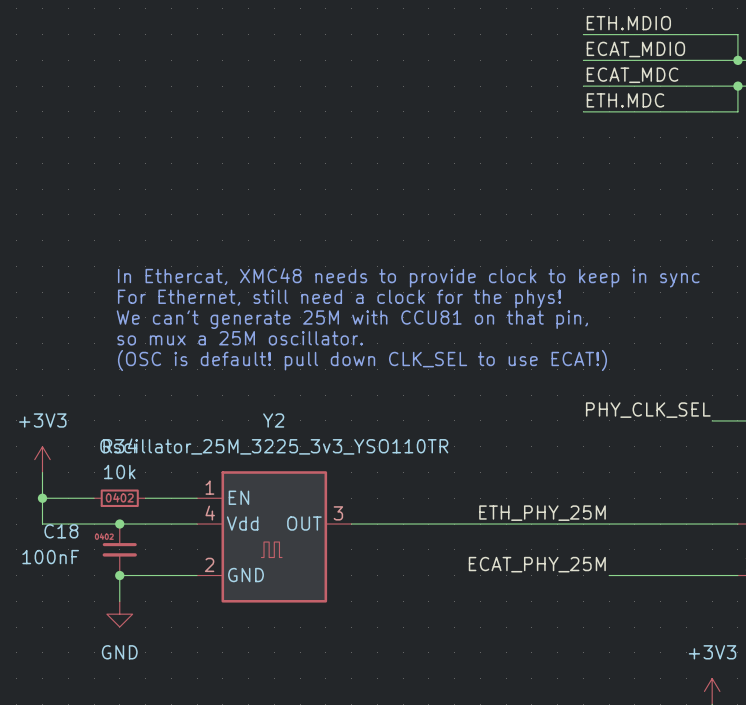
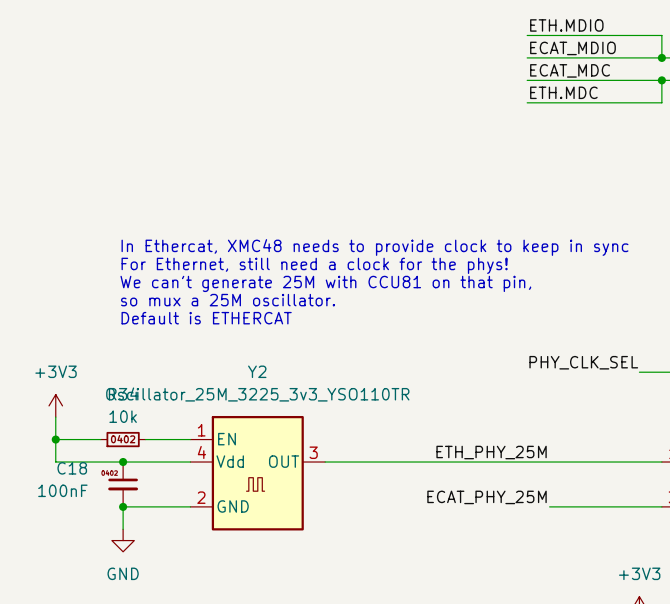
text: (OSC is default! pull down CLK_SEL to use ECAT!) (362, 360) -> Default is ETHERCAT (206, 318)

